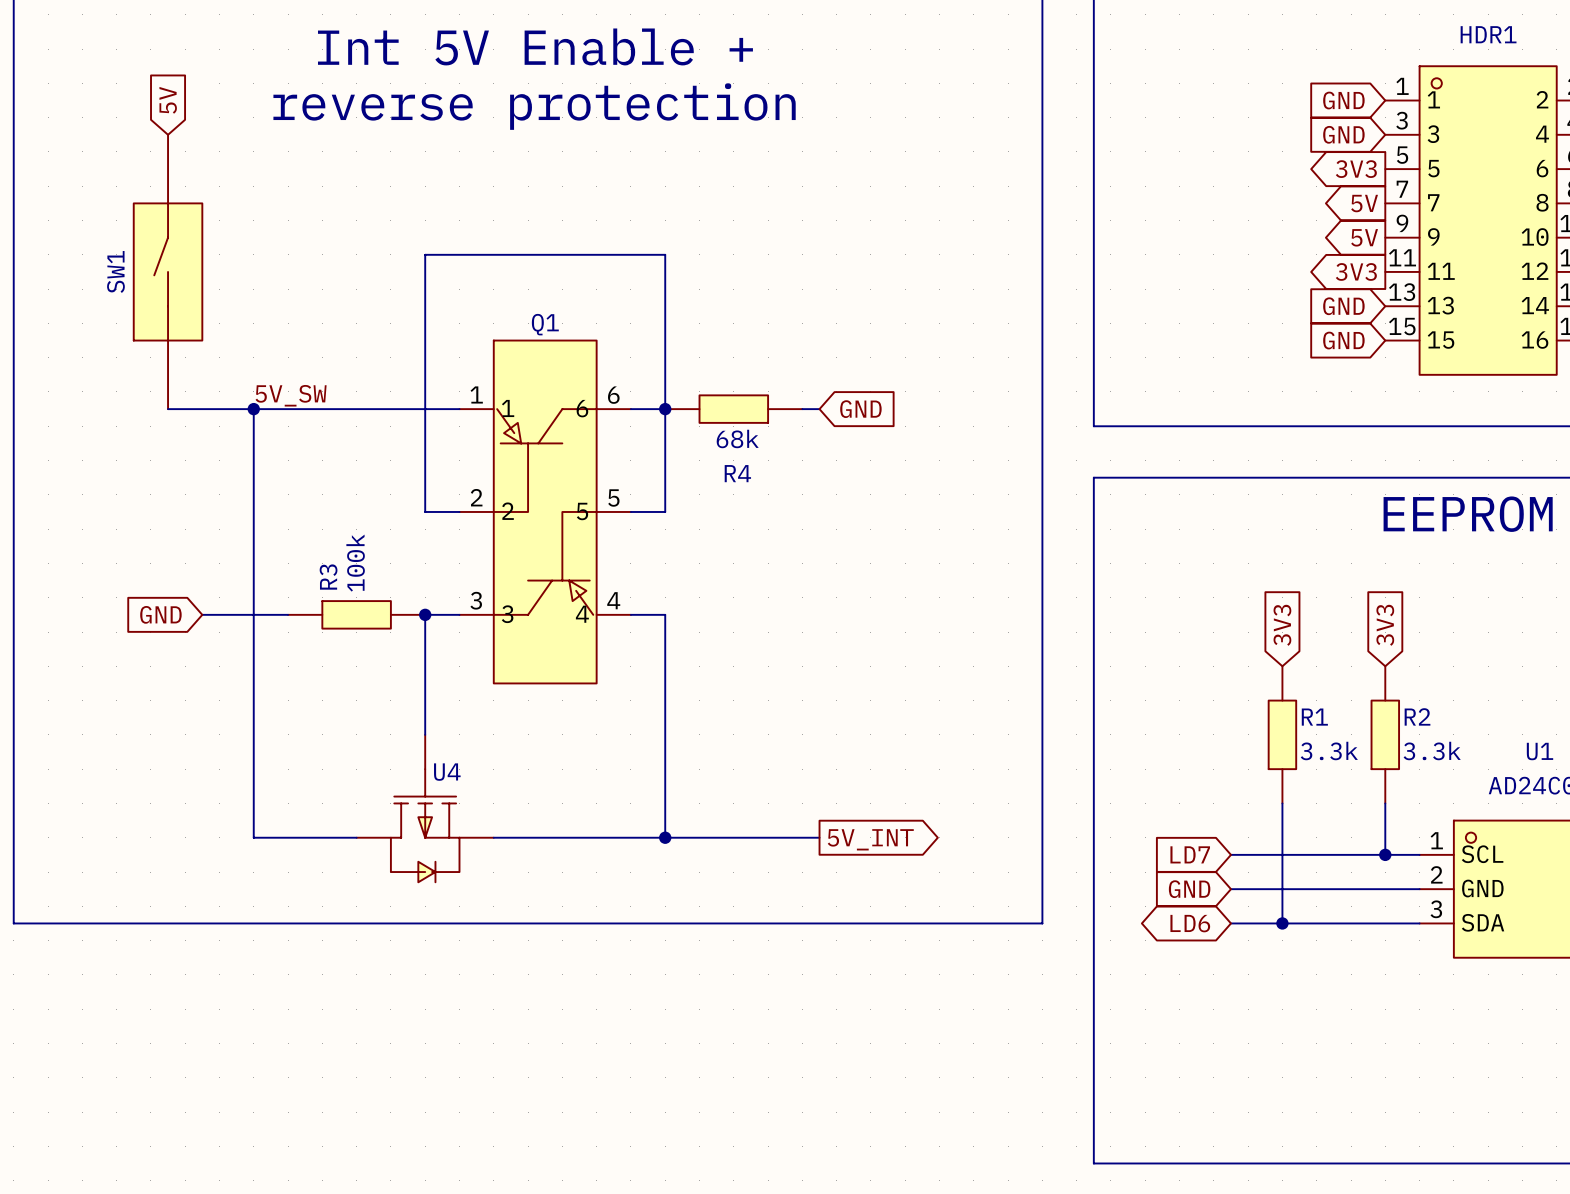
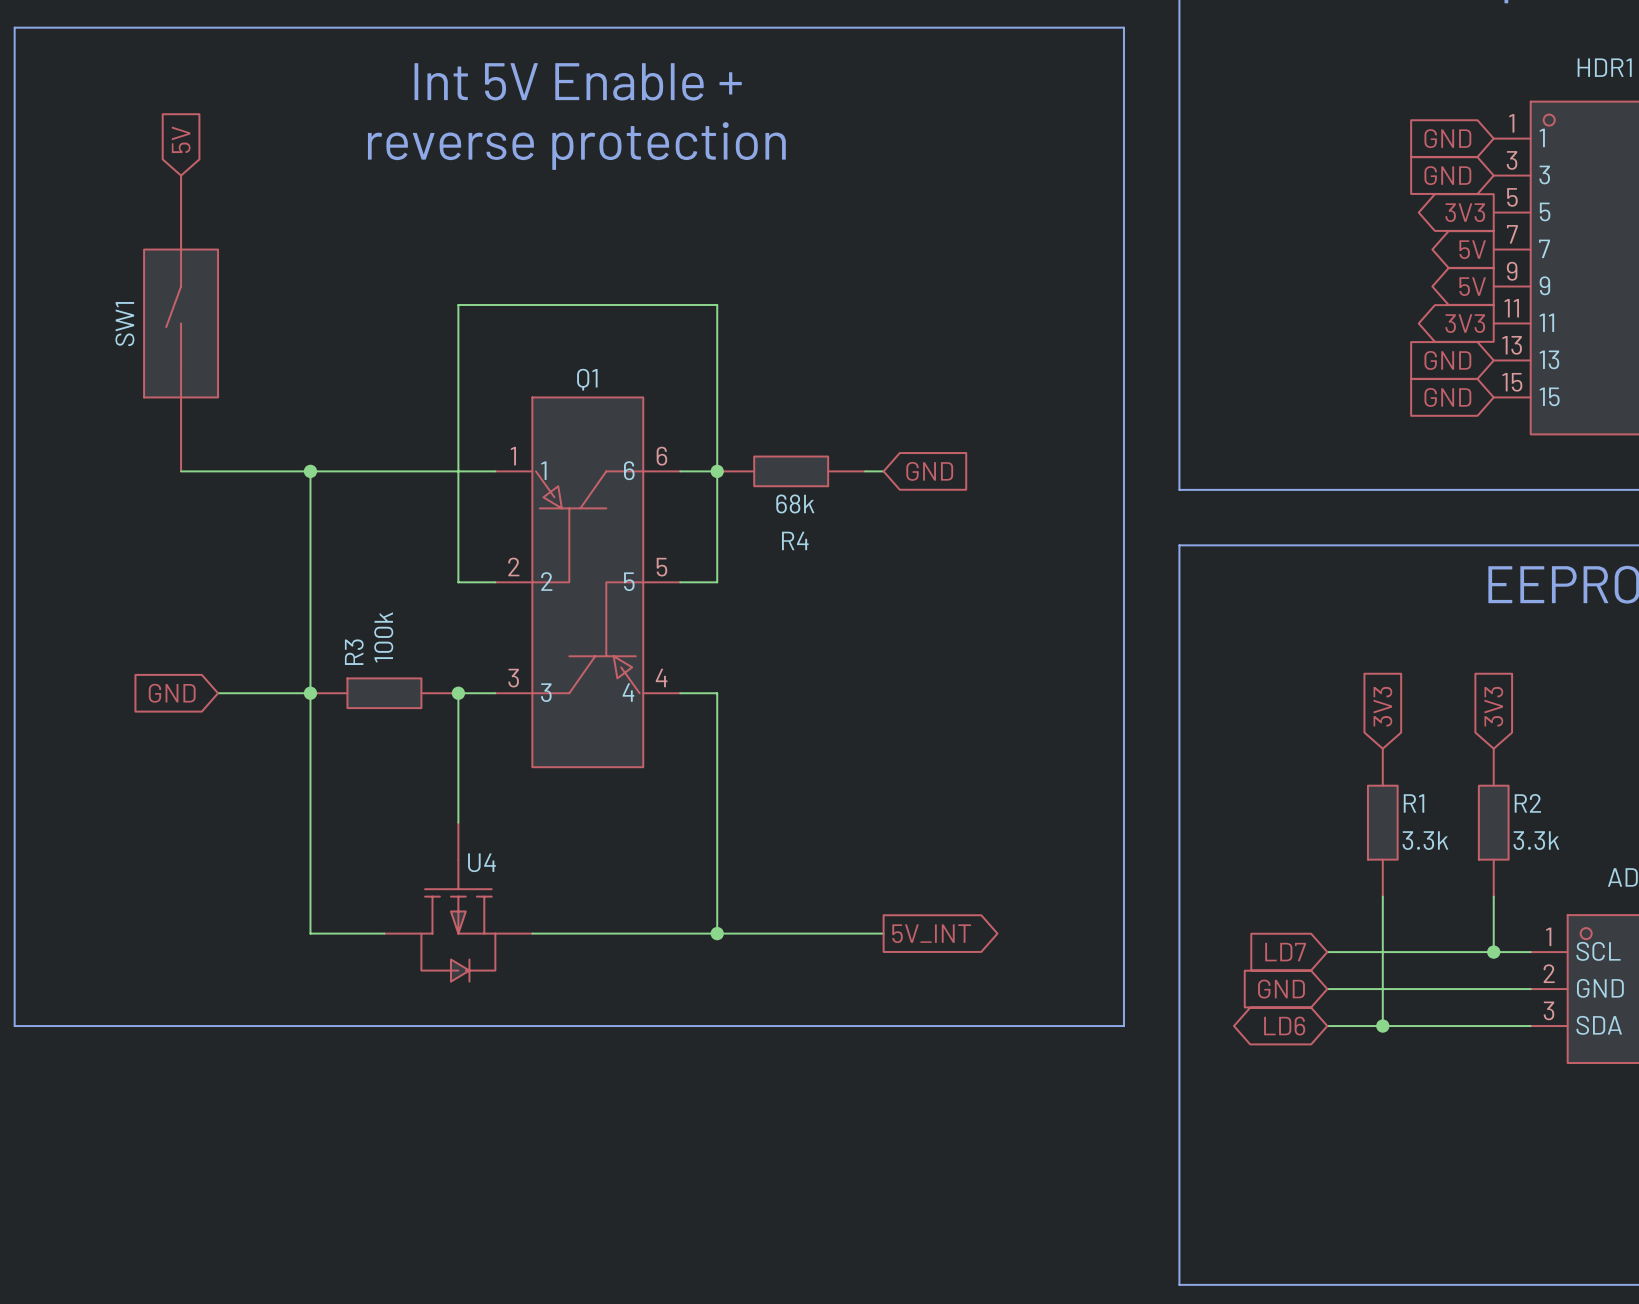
label: 5V_SW (291, 395) -> none
wire: (253, 409) (253, 837) (288, 837) -> (310, 471) (310, 933)
junction position: (253, 409) -> (310, 471)
junction: none -> (310, 693)

